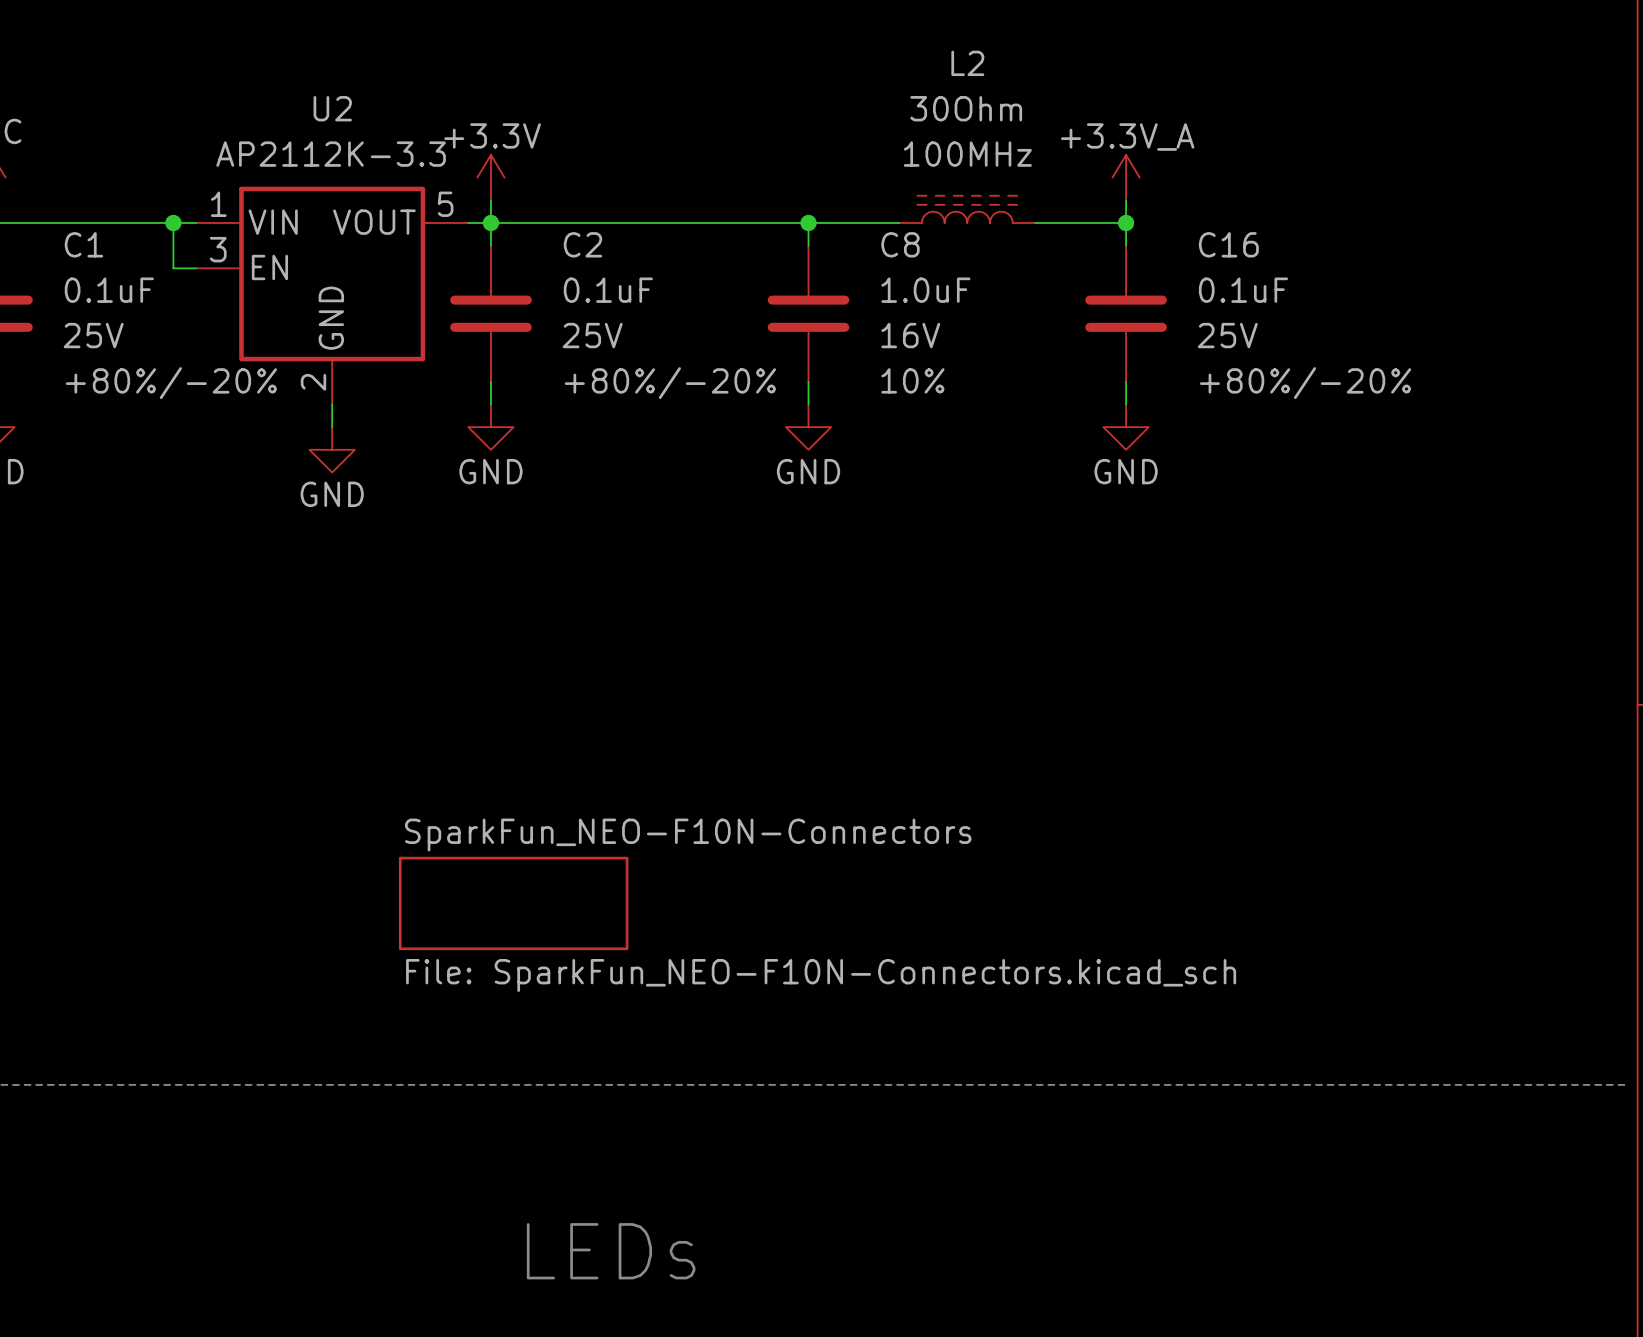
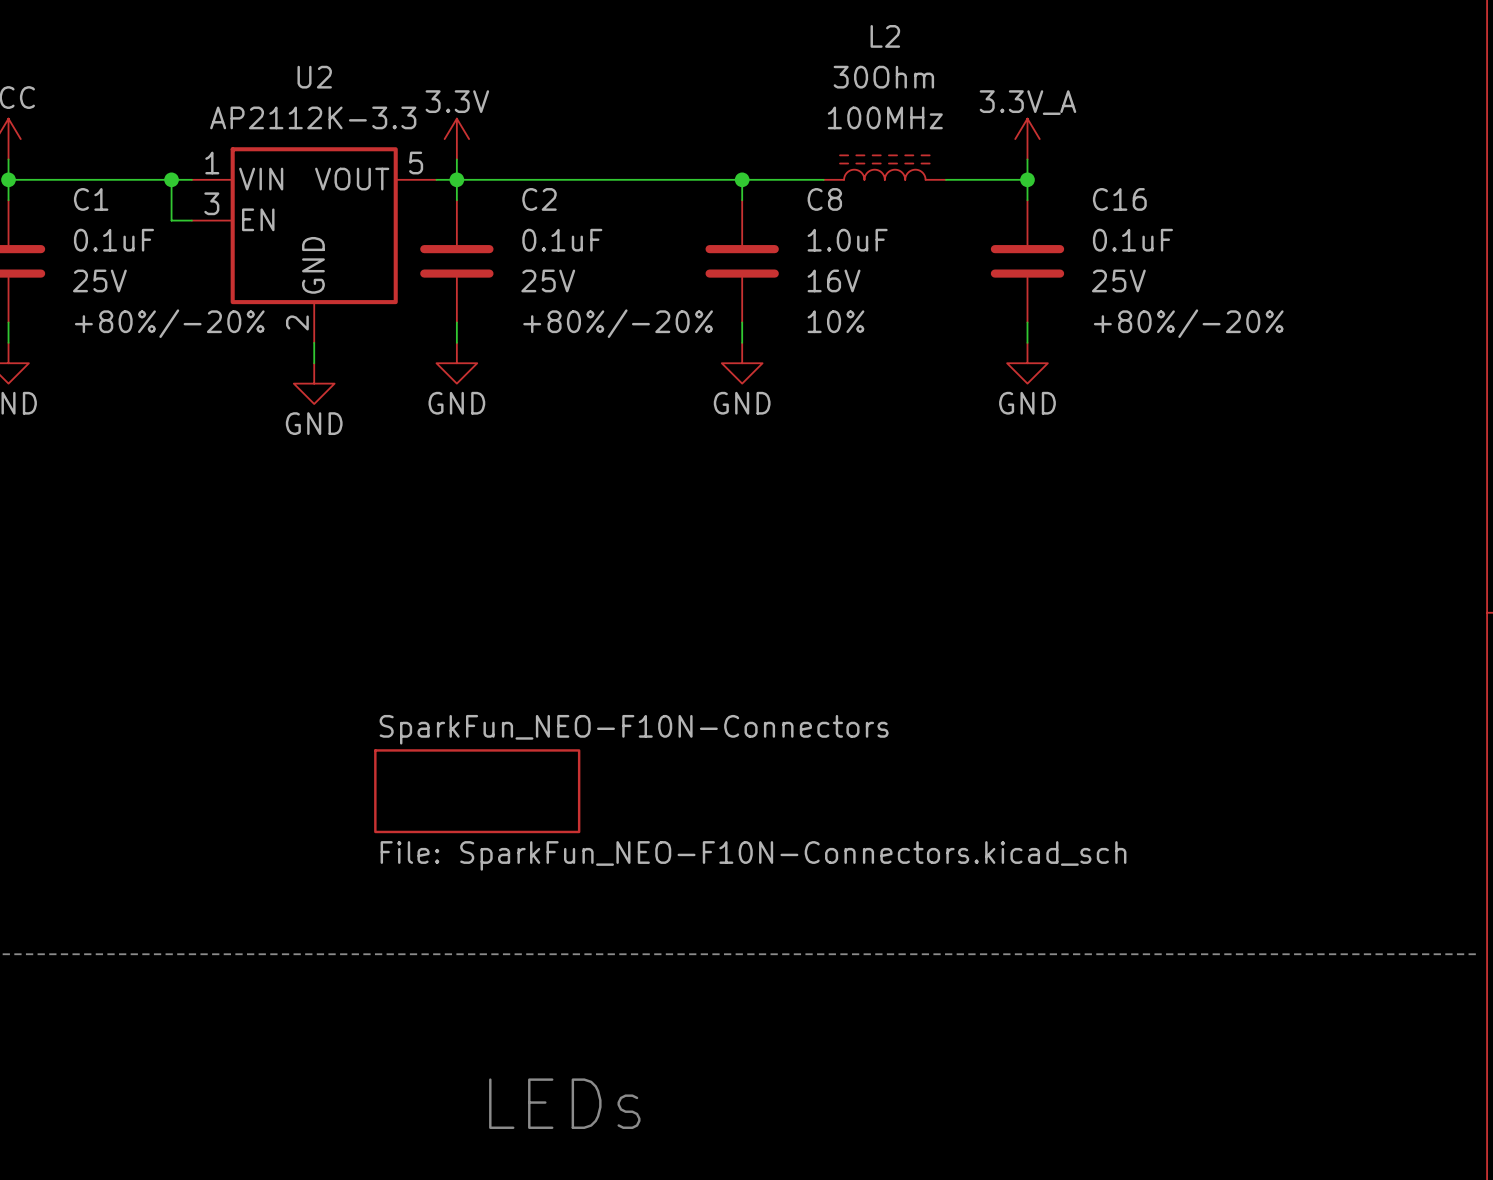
power symbol: +3.3V (490, 177) -> 3.3V (456, 139)
power symbol: +3.3V_A (1126, 177) -> 3.3V_A (1027, 139)

